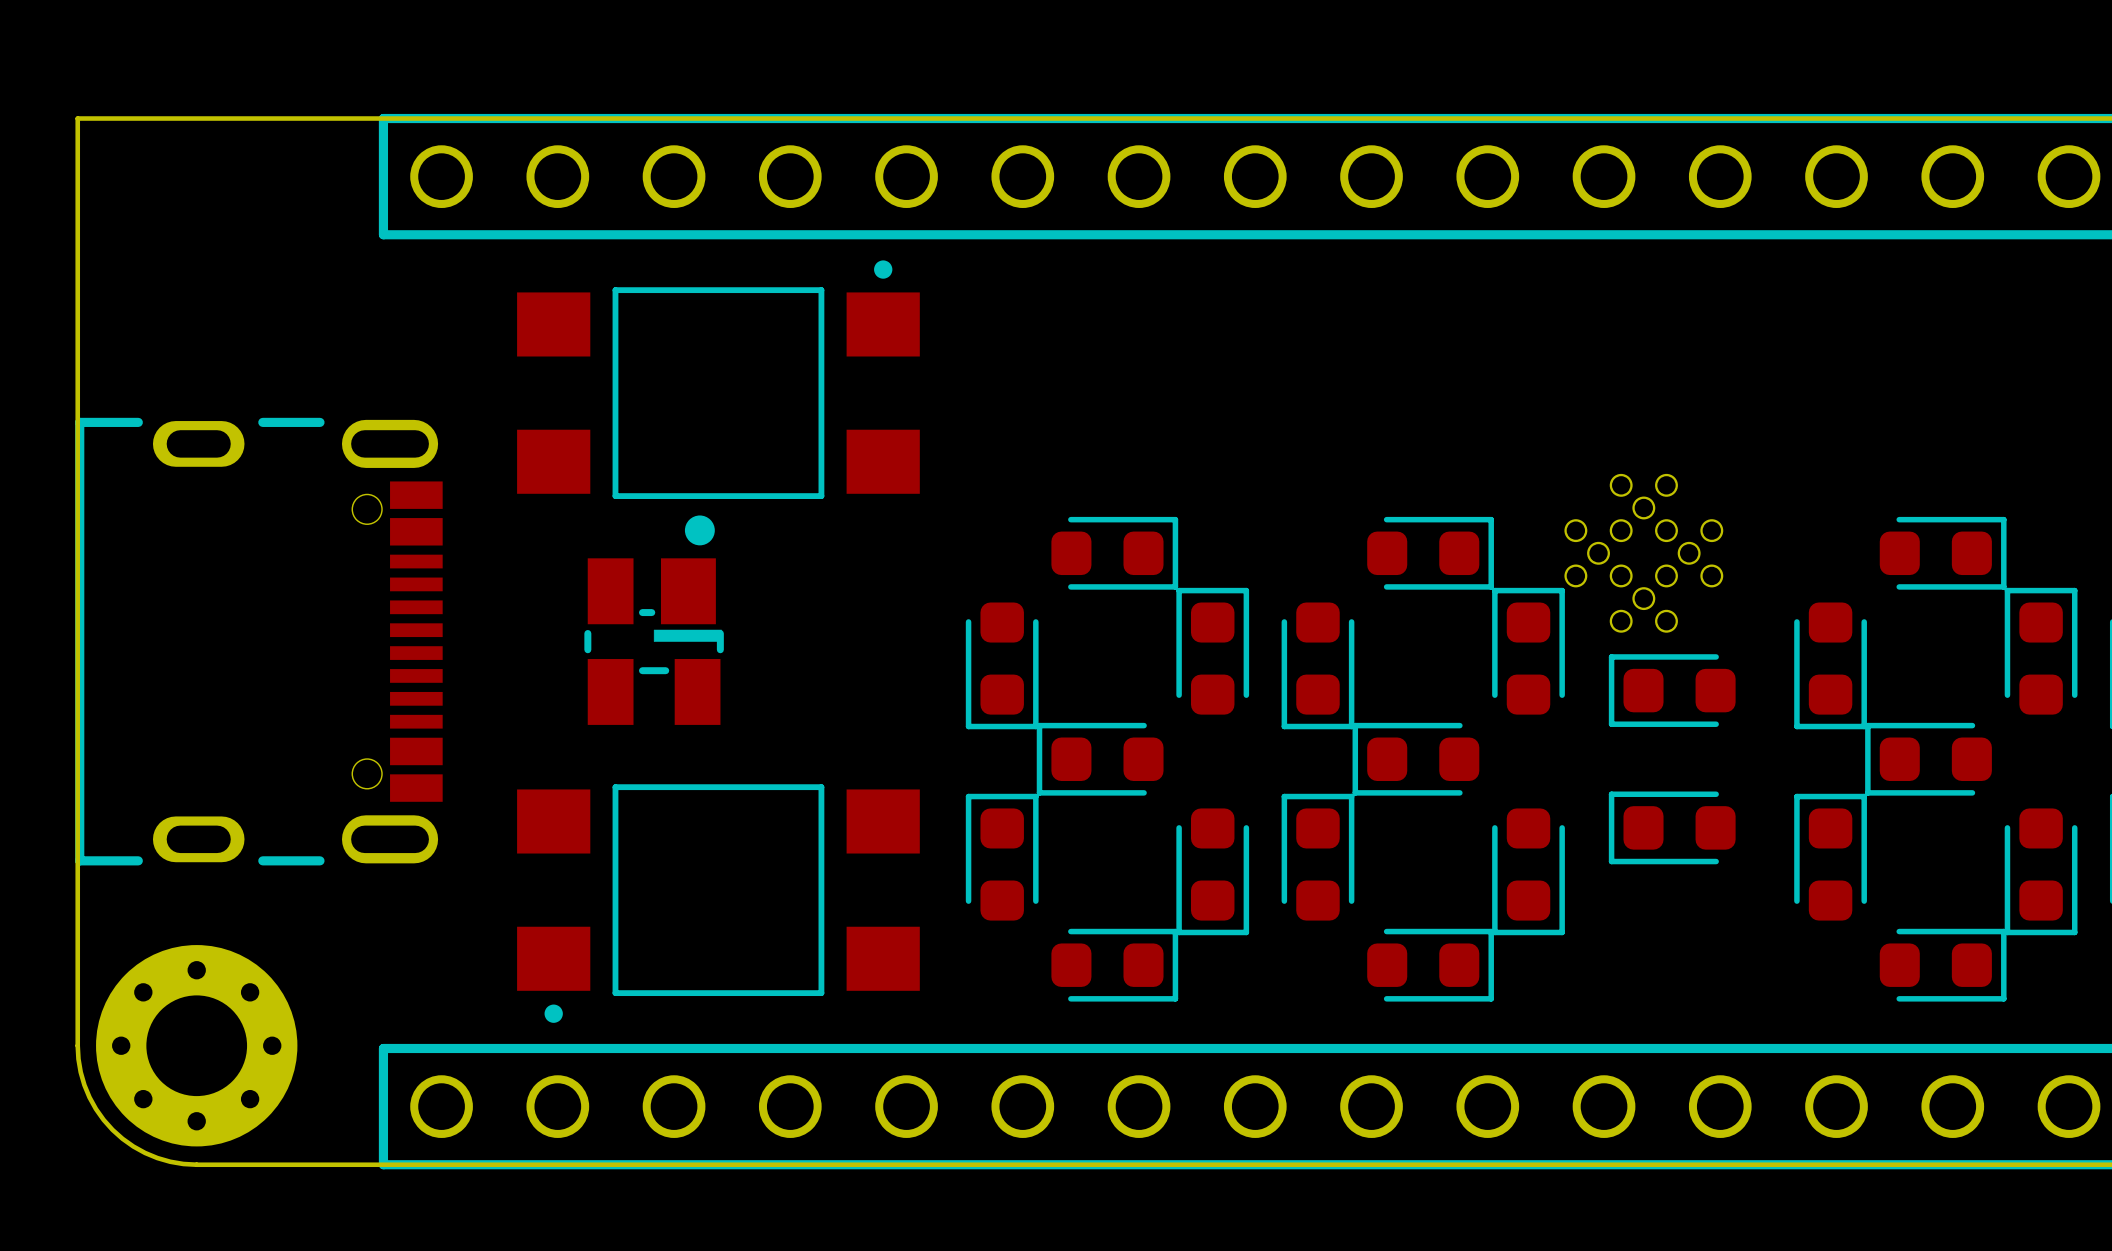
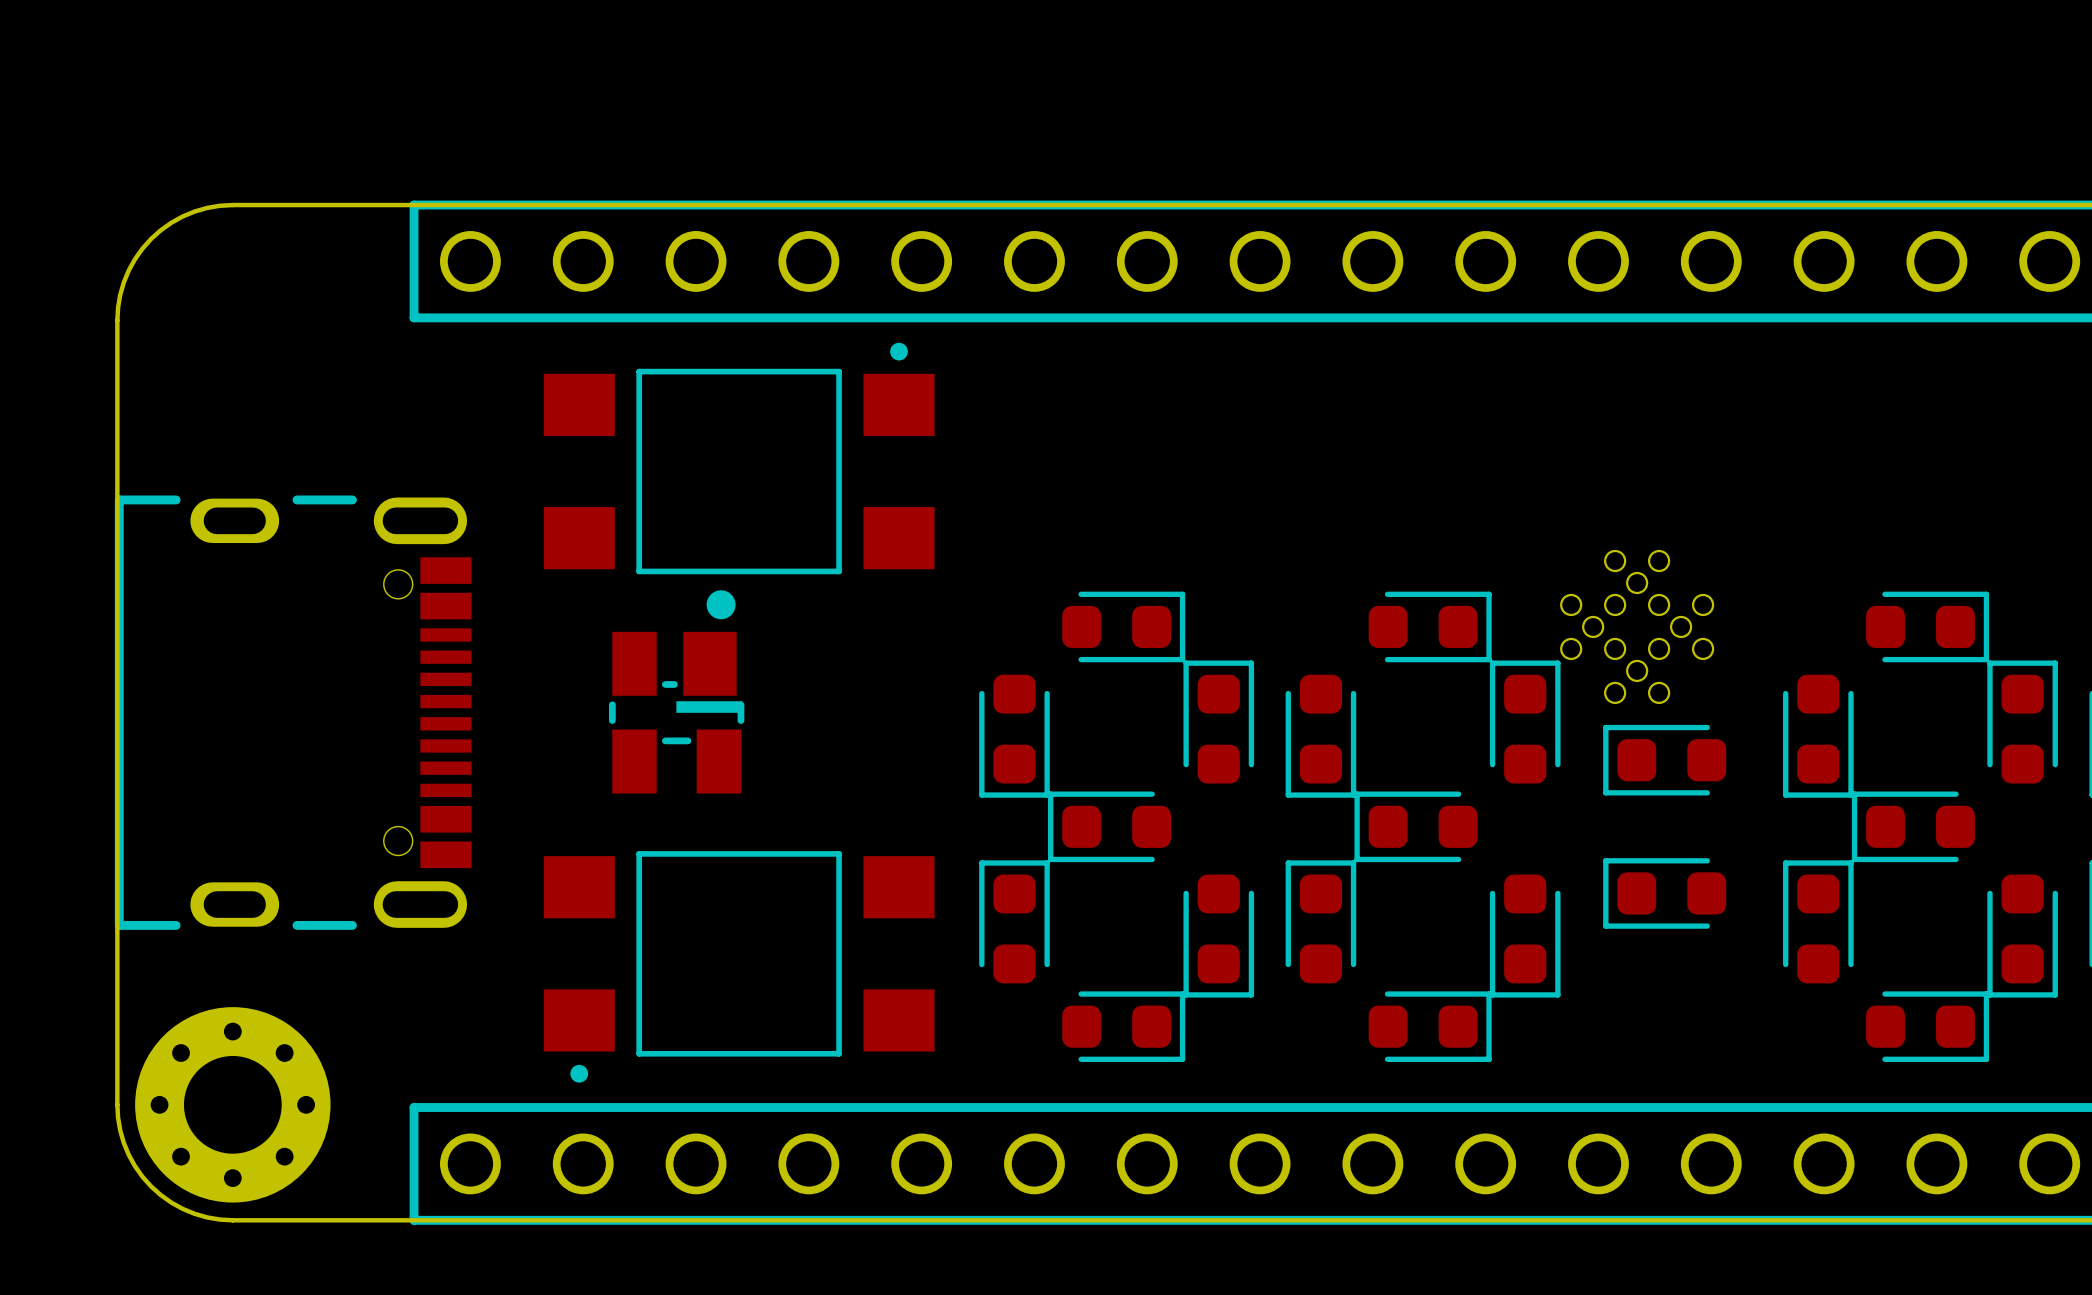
board edge: (196, 118) (77, 118) (77, 237) -> (232, 205) (194, 211) (171, 222) (151, 238) (128, 270) (120, 294) (117, 320)

